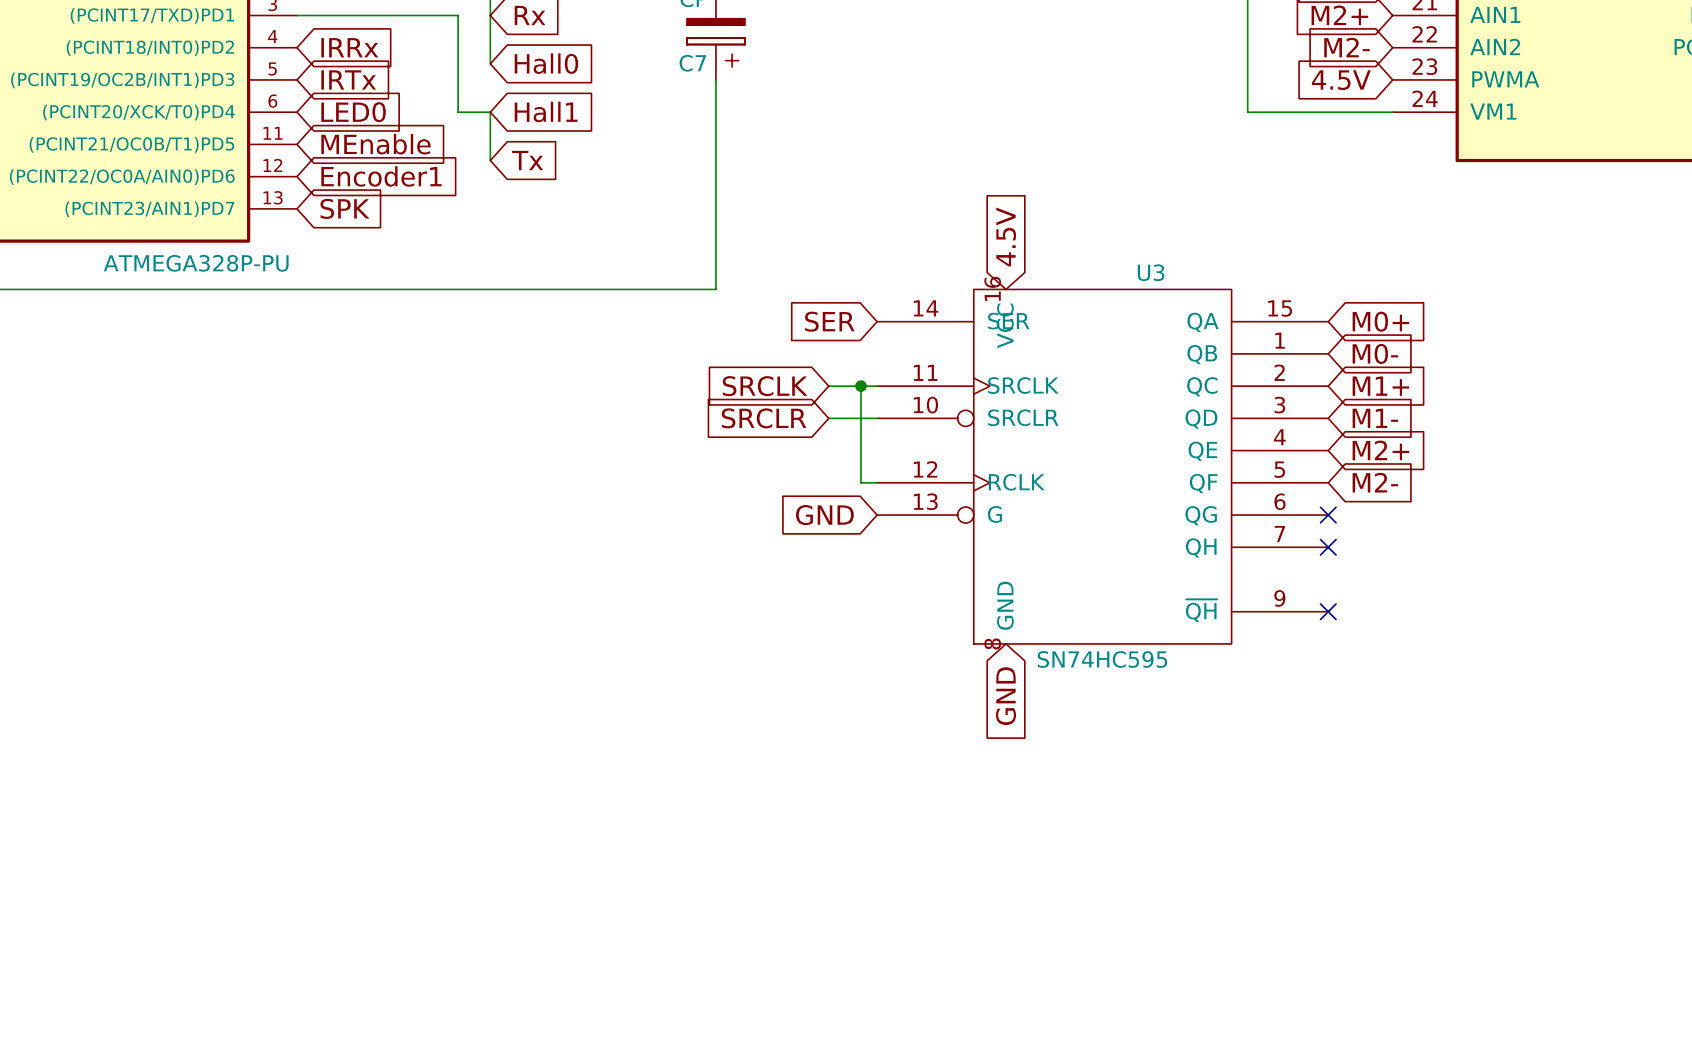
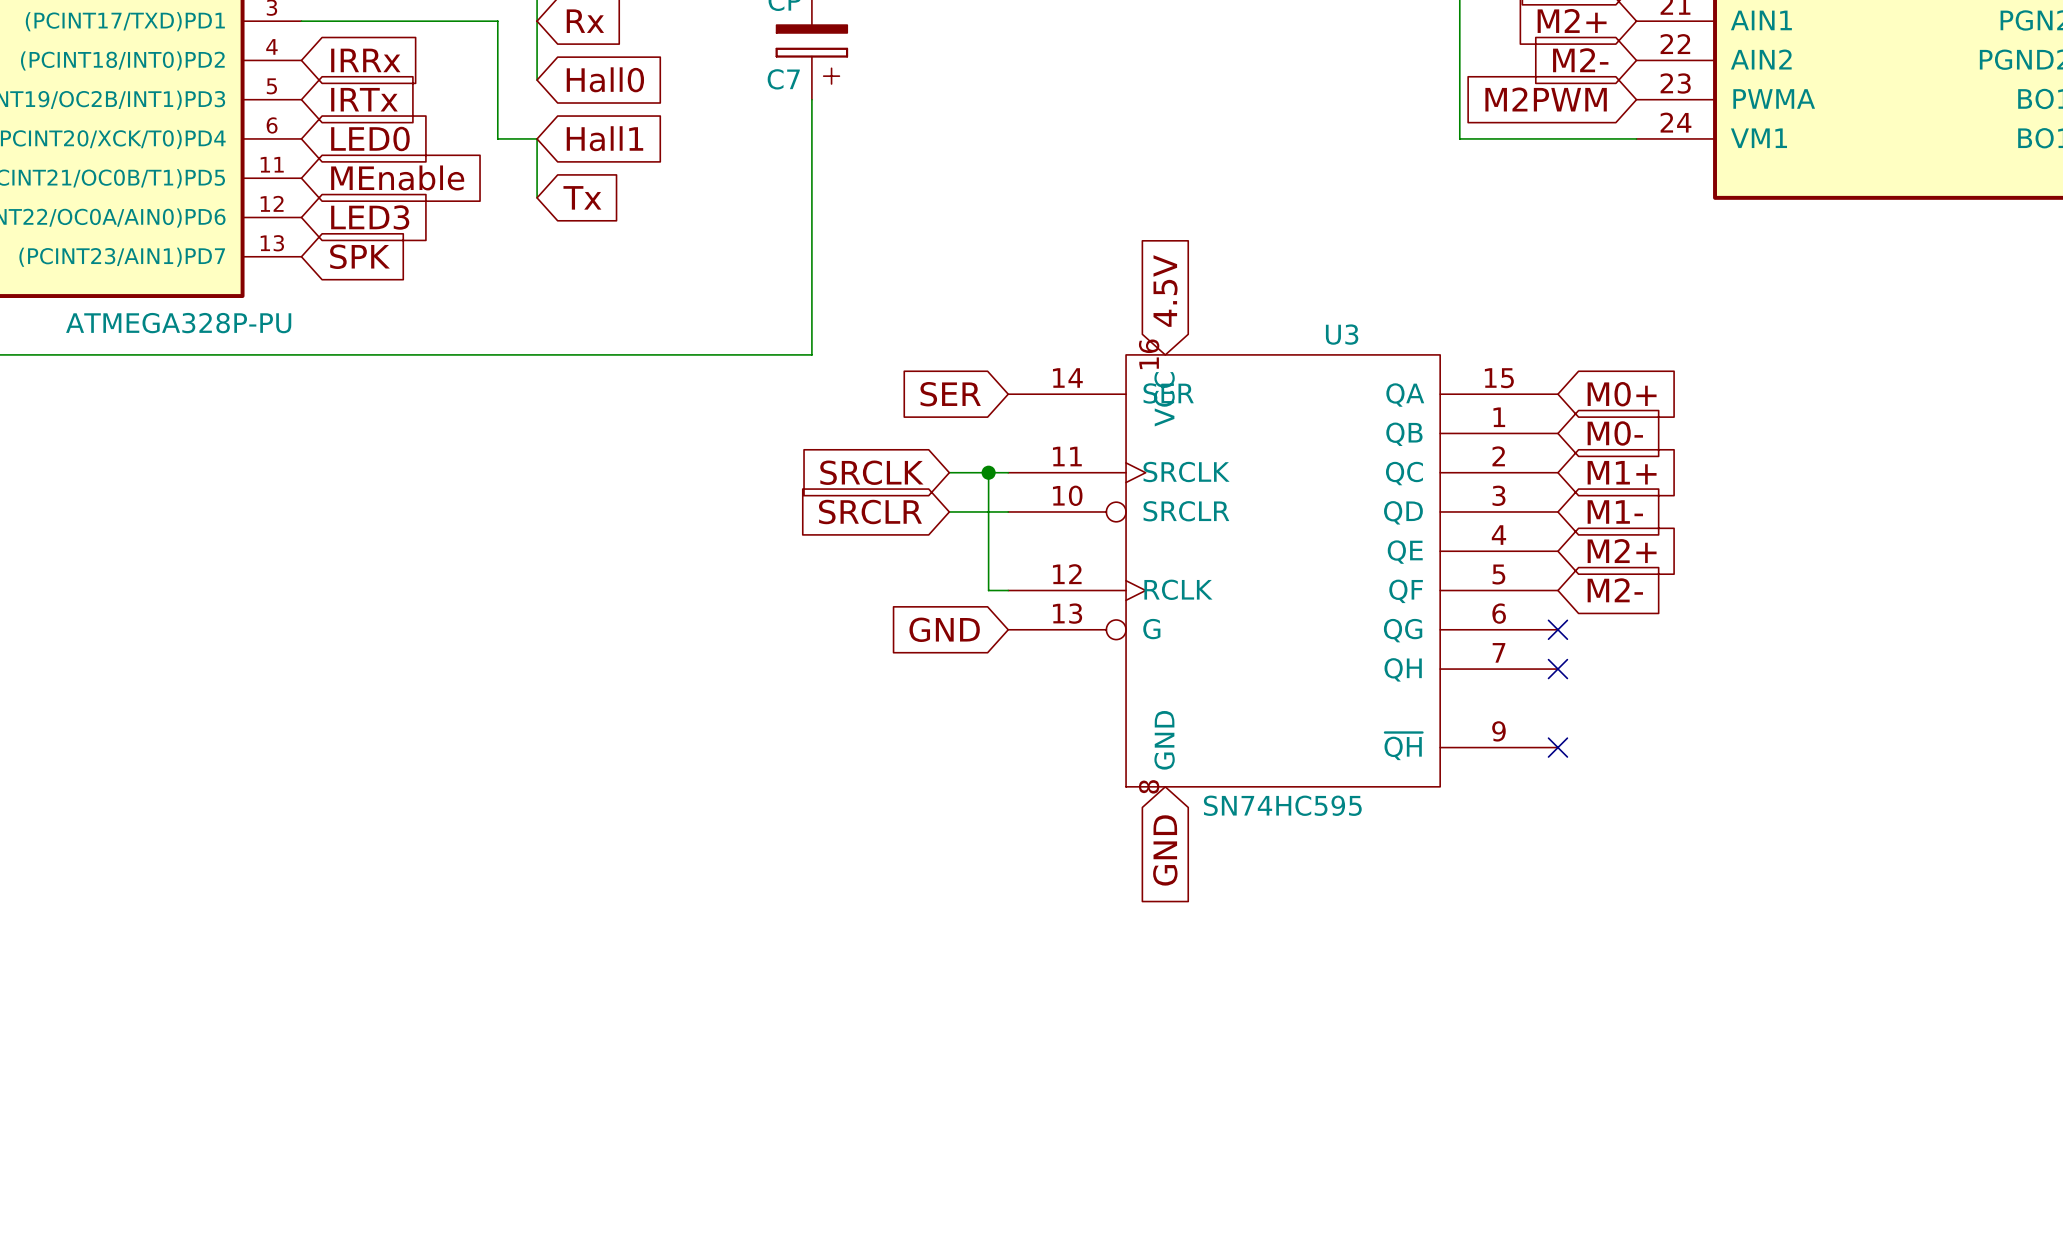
global label: 4.5V (1341, 80) -> M2PWM (1546, 99)
global label: Encoder1 (381, 176) -> LED3 (370, 217)

